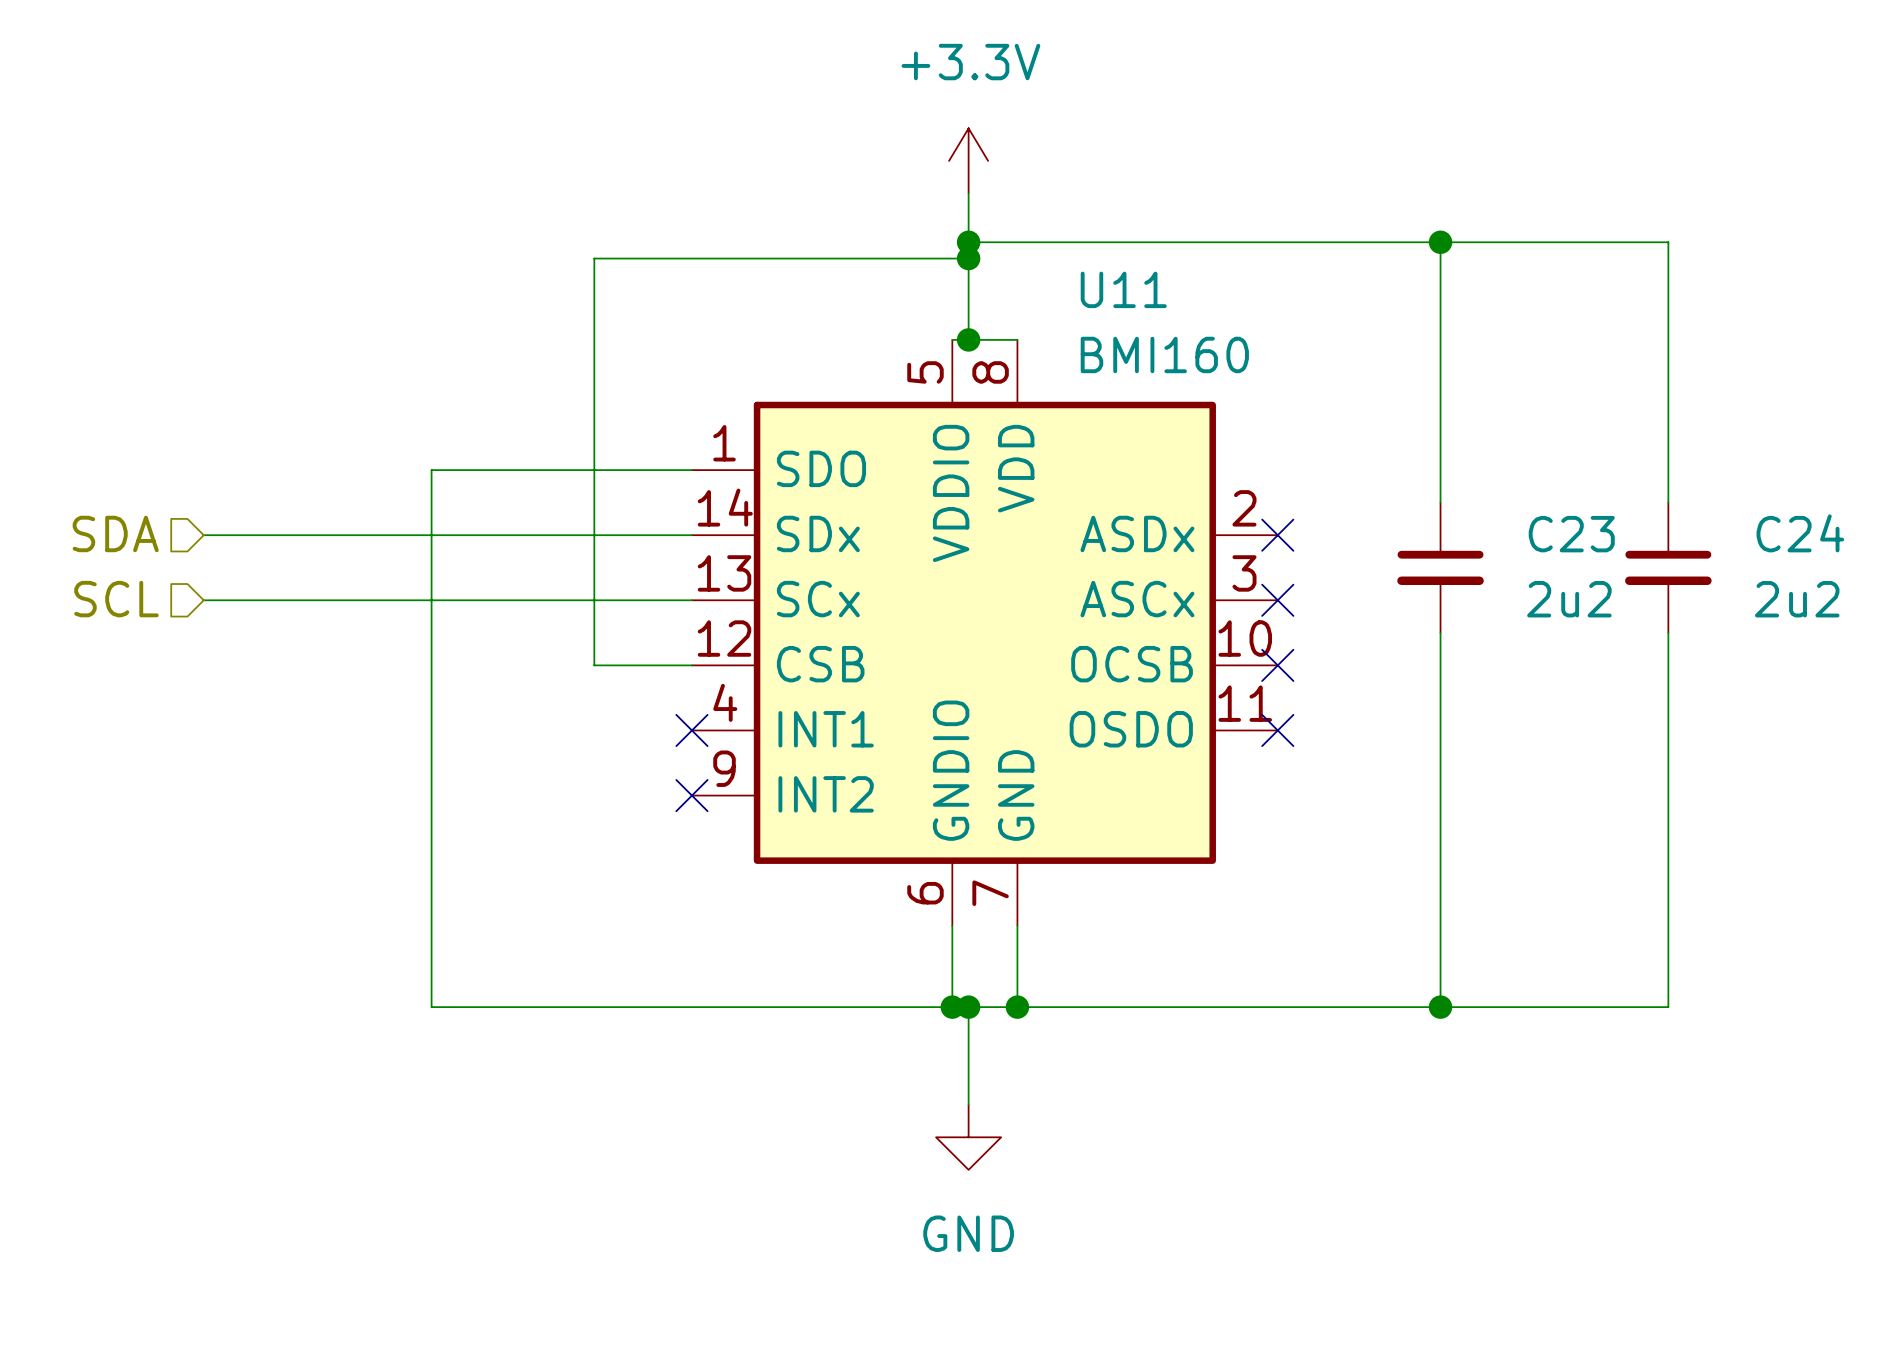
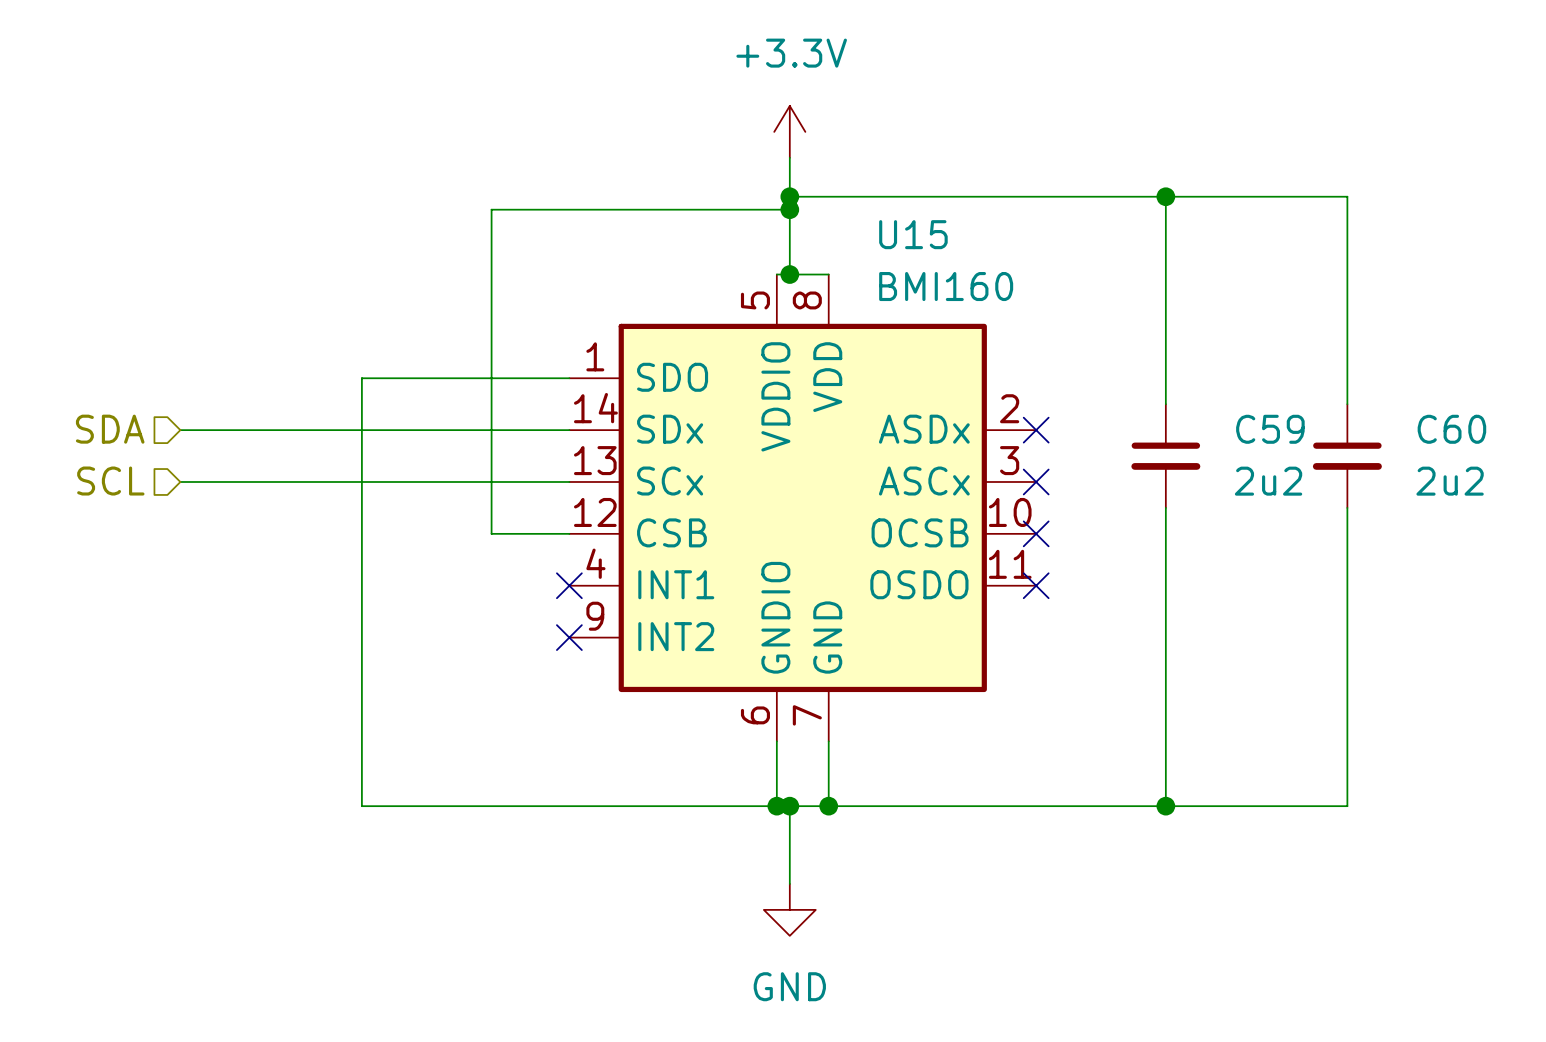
U11 name: U11 (1123, 289) -> U15 (913, 234)
C24 name: C24 (1800, 533) -> C60 (1451, 429)
C23 name: C23 (1571, 534) -> C59 (1270, 429)

